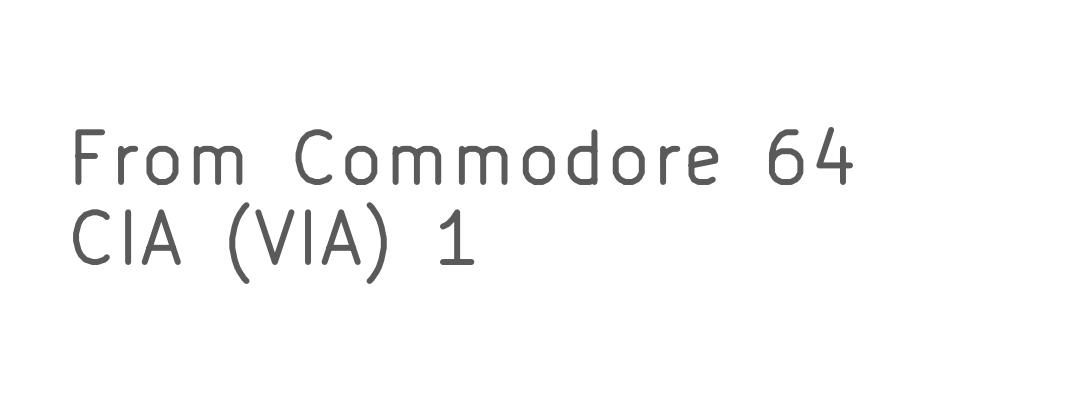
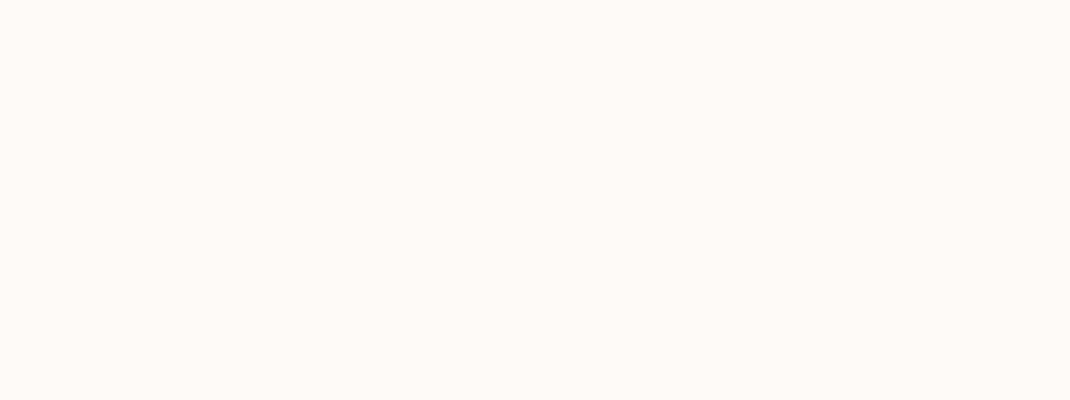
text: From Commodore 64 (464, 155) -> none
text: CIA (VIA) 1 (273, 243) -> none

